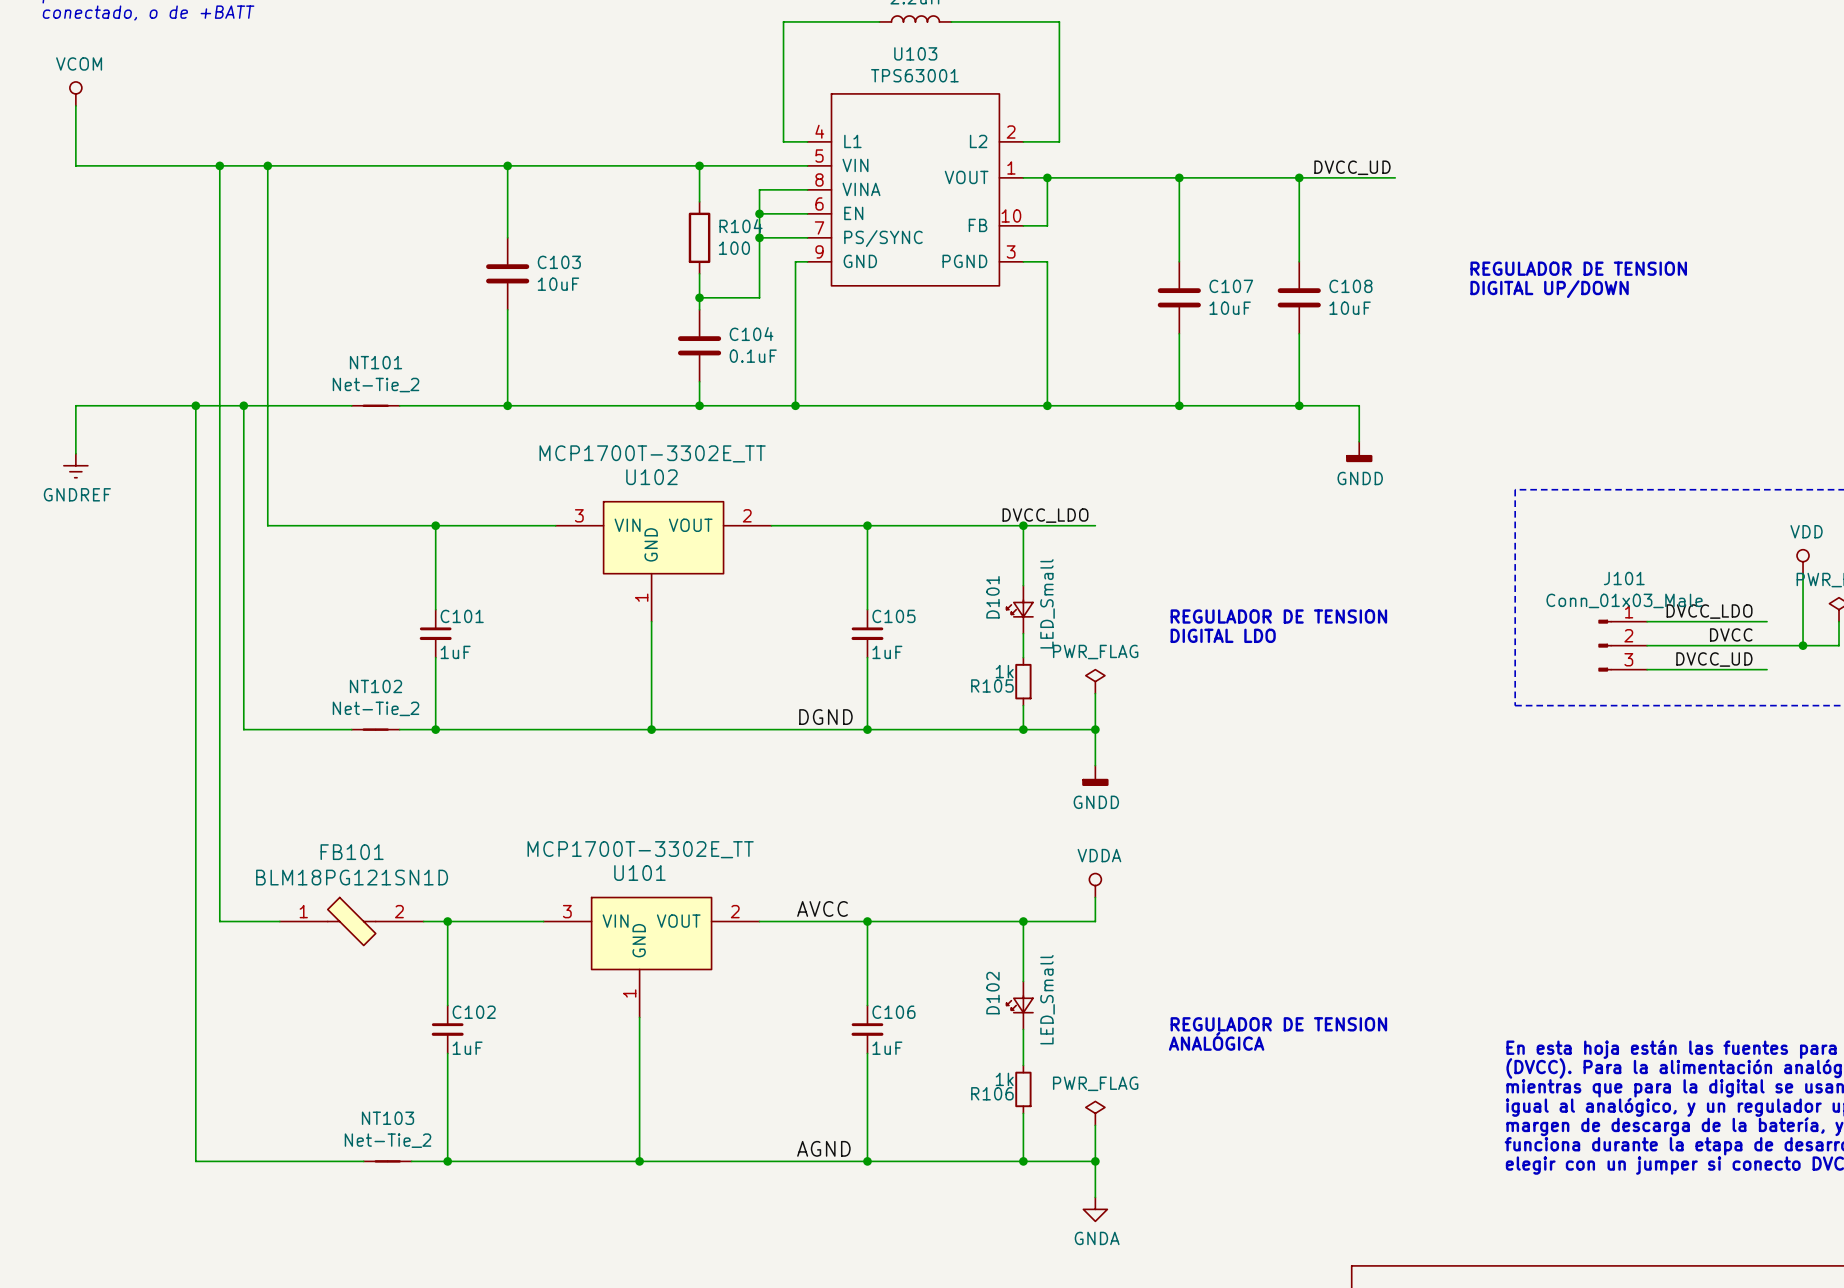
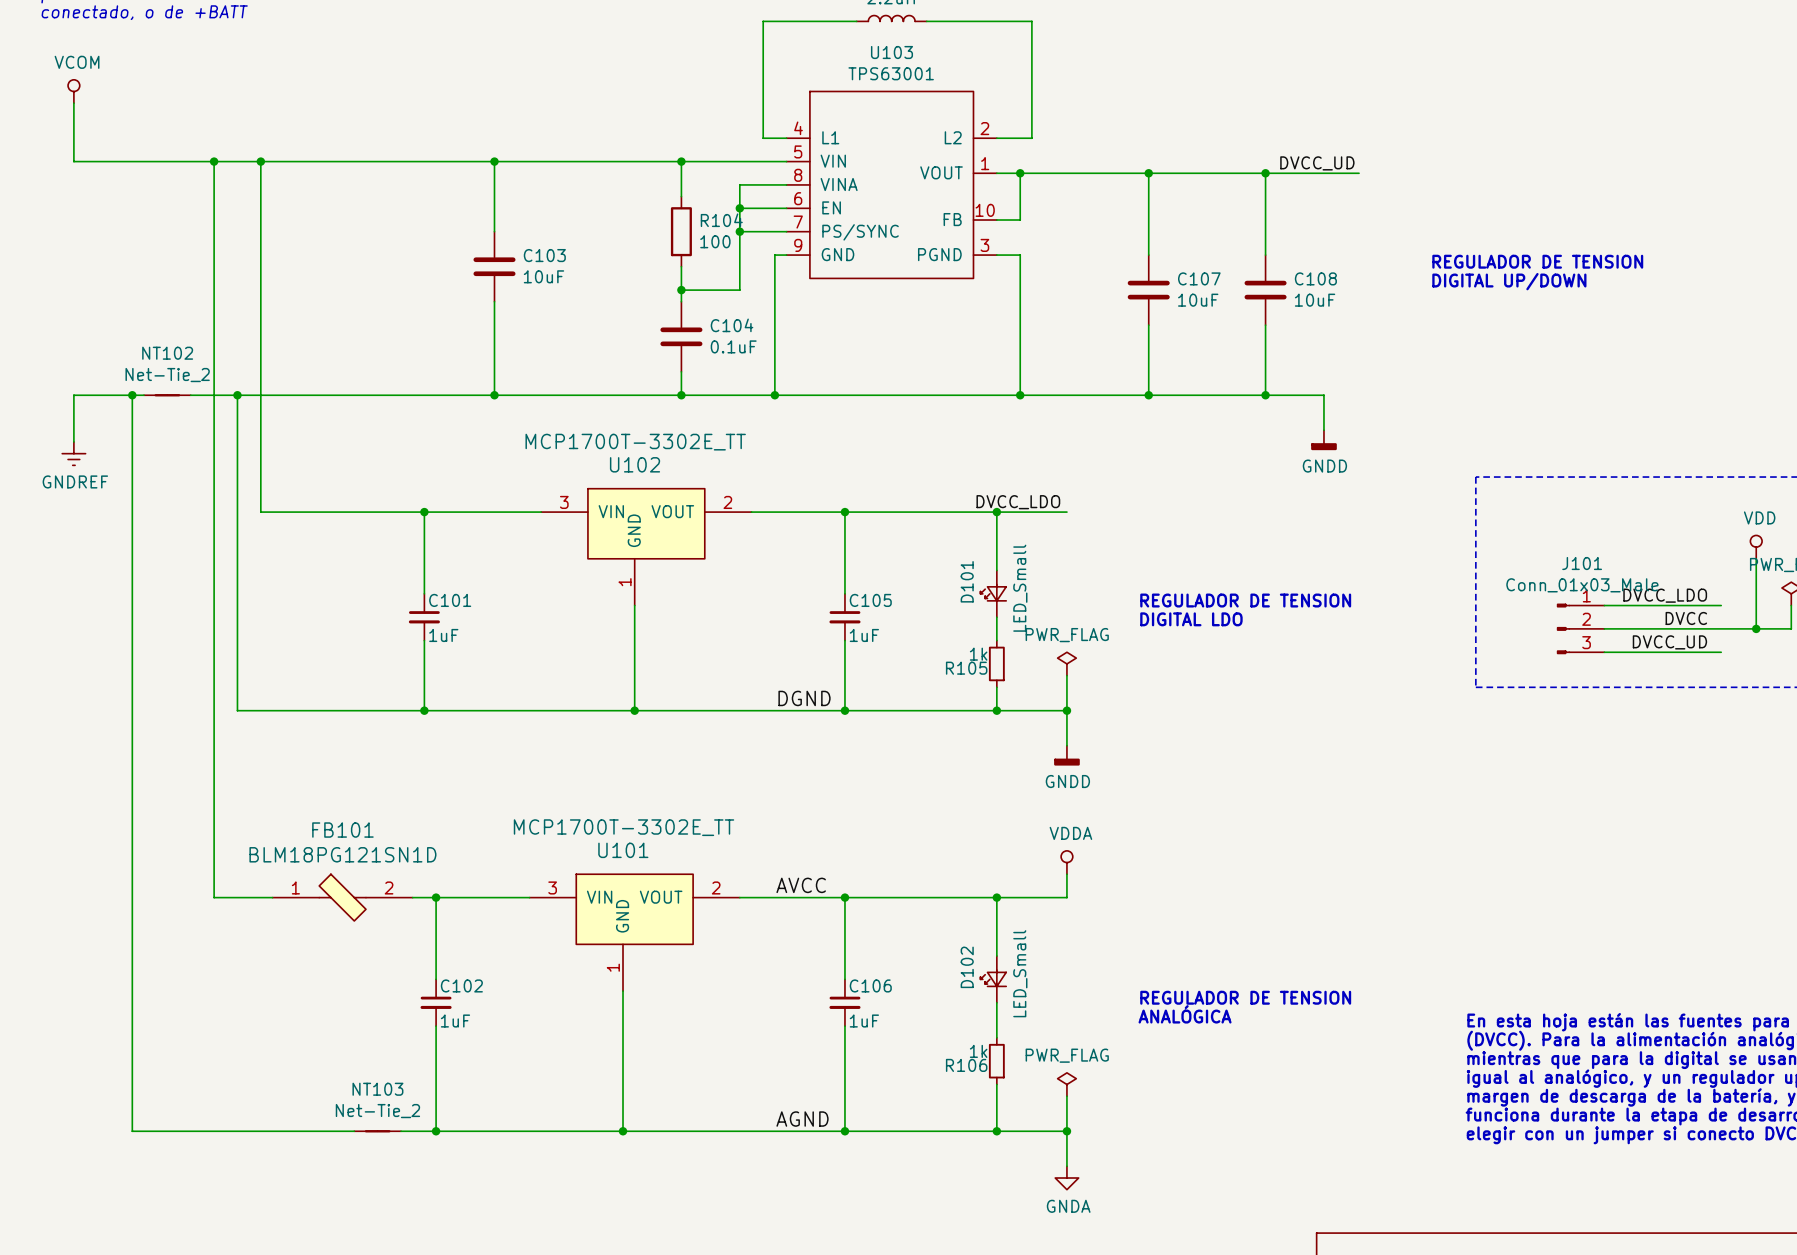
junction: none -> (132, 395)
wire: (147, 405) (195, 405) (195, 1161) -> (132, 395) (132, 1131) (190, 1131)
junction: (195, 405) -> none
NT101: Net-Tie_2 (375, 405) -> none
NT102 position: (375, 729) -> (167, 395)

